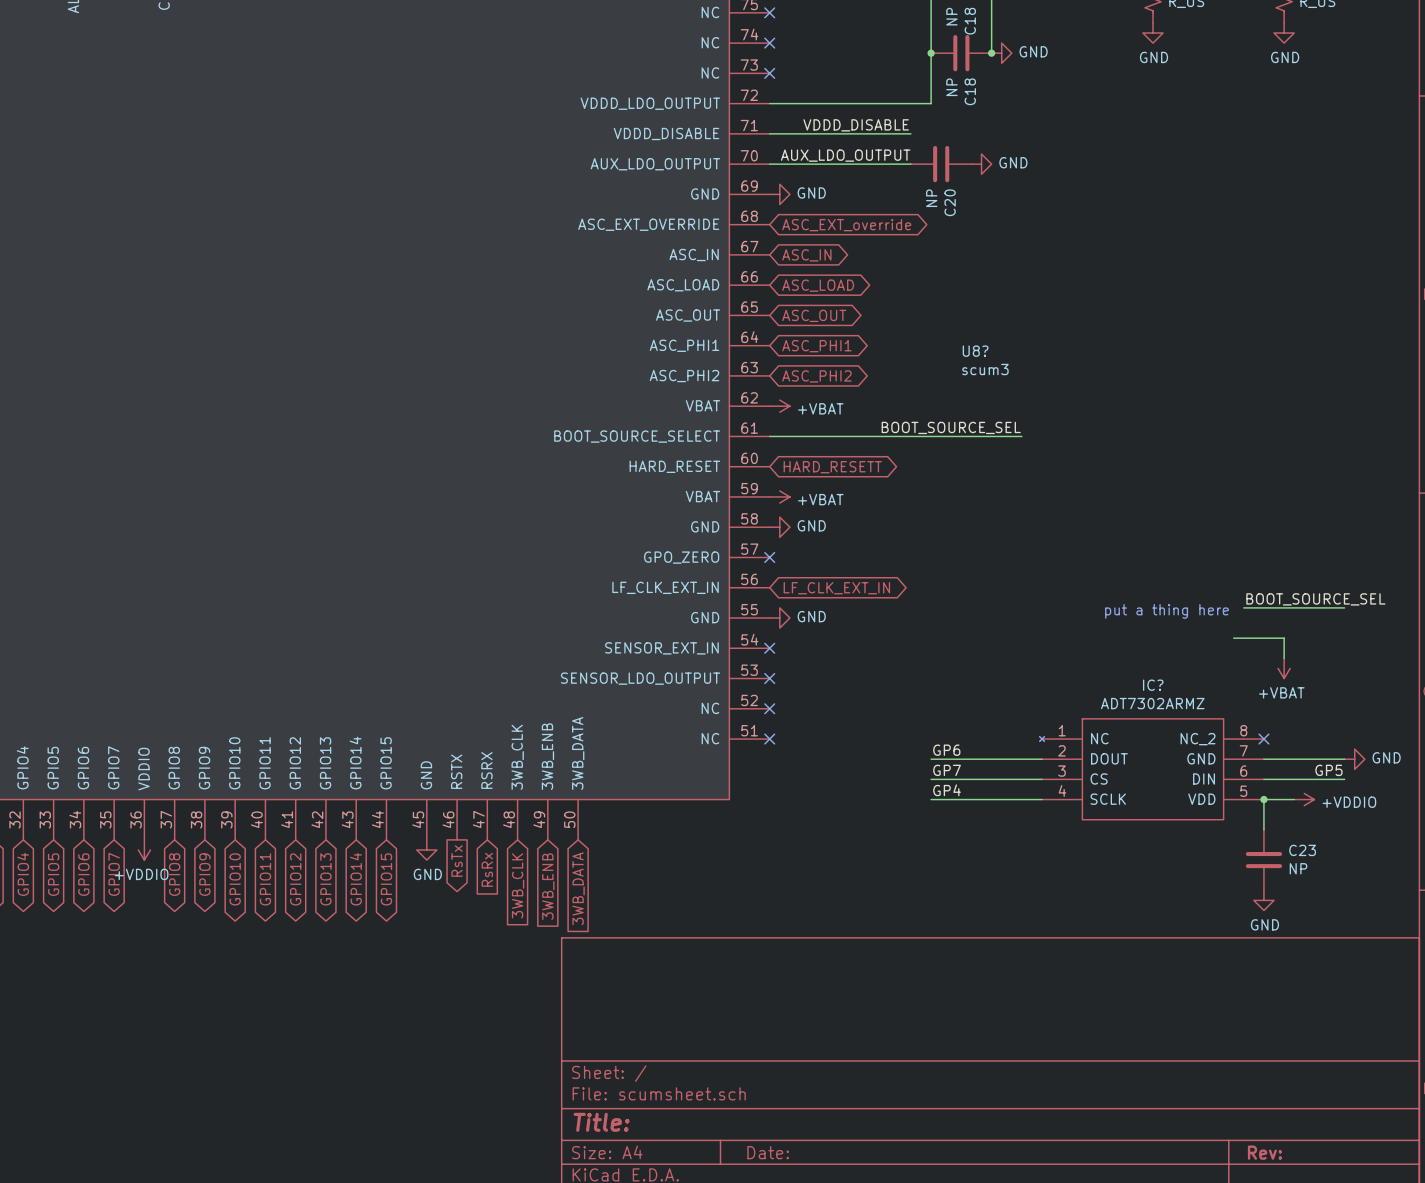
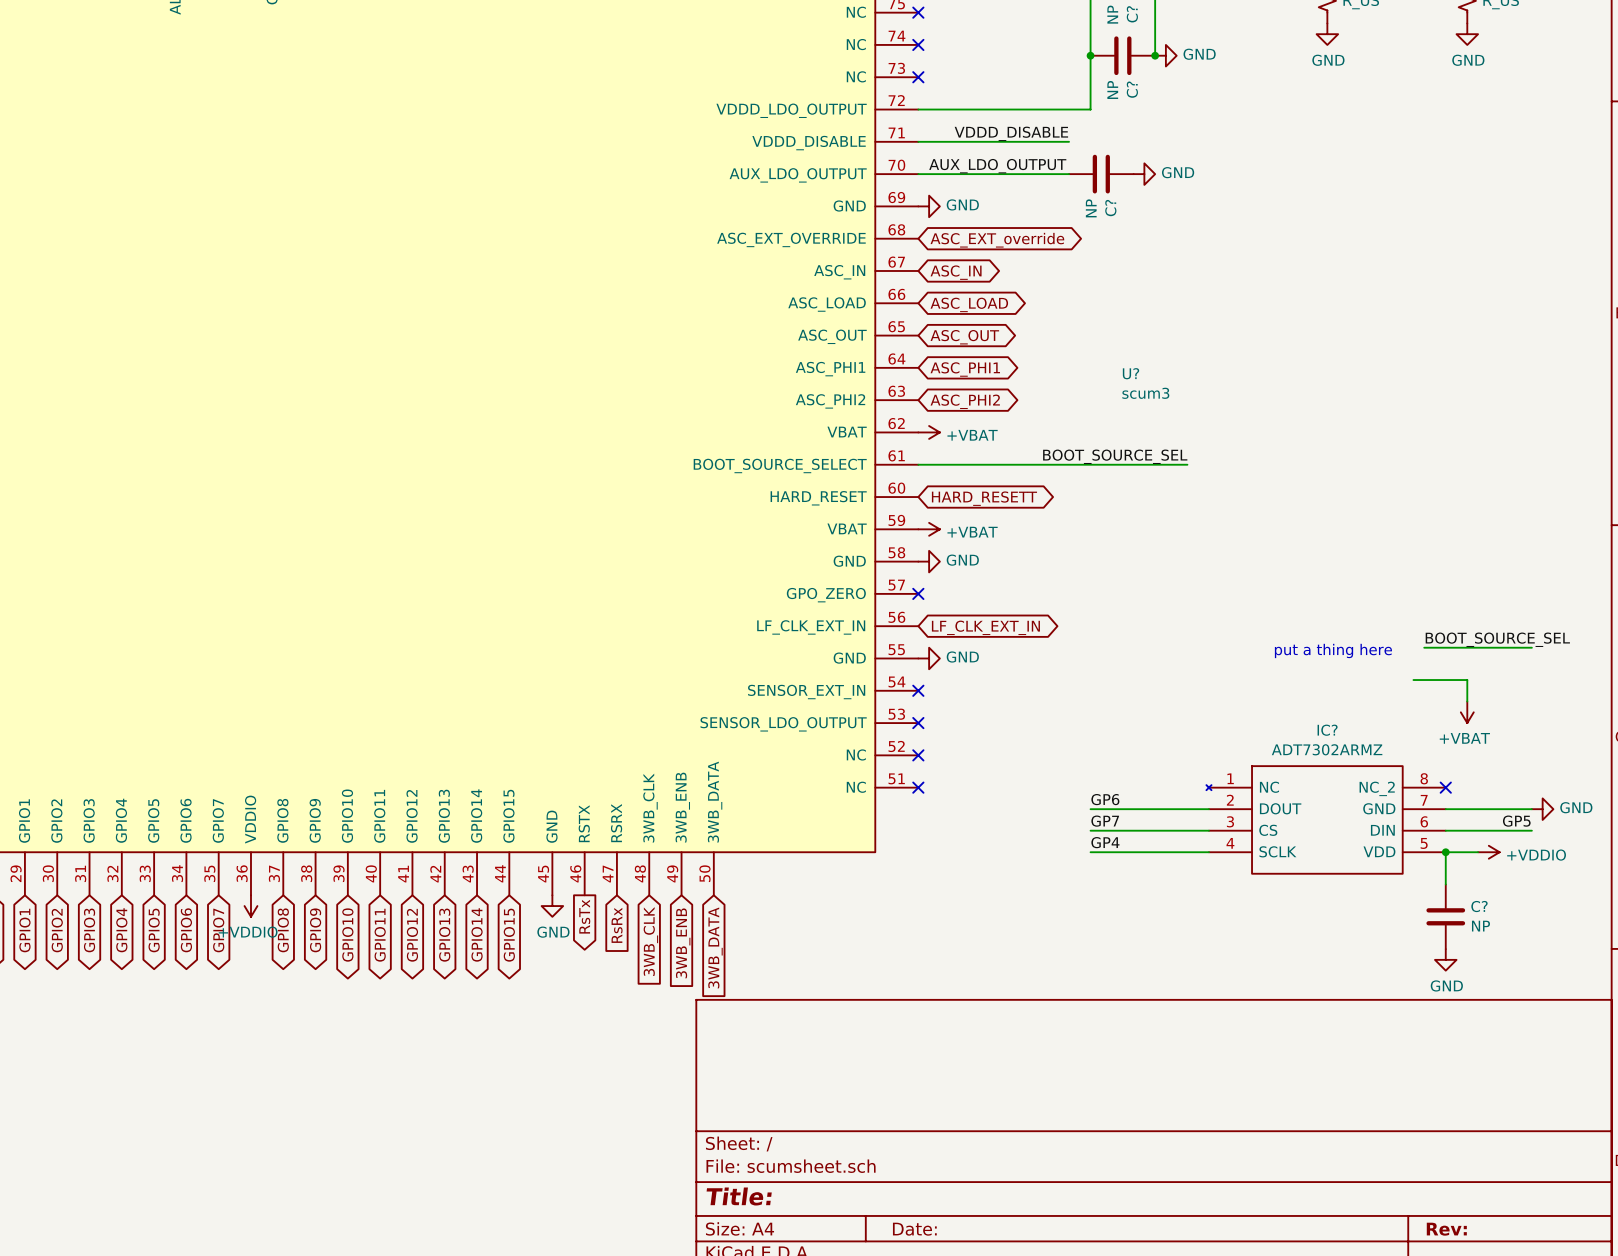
C18 name: C18 (970, 21) -> C? (1132, 14)
C18 name: C18 (970, 91) -> C? (1132, 89)
C20 name: C20 (950, 202) -> C? (1110, 208)
U8? name: U8? (975, 351) -> U? (1131, 373)
C23 name: C23 (1302, 850) -> C? (1479, 906)

